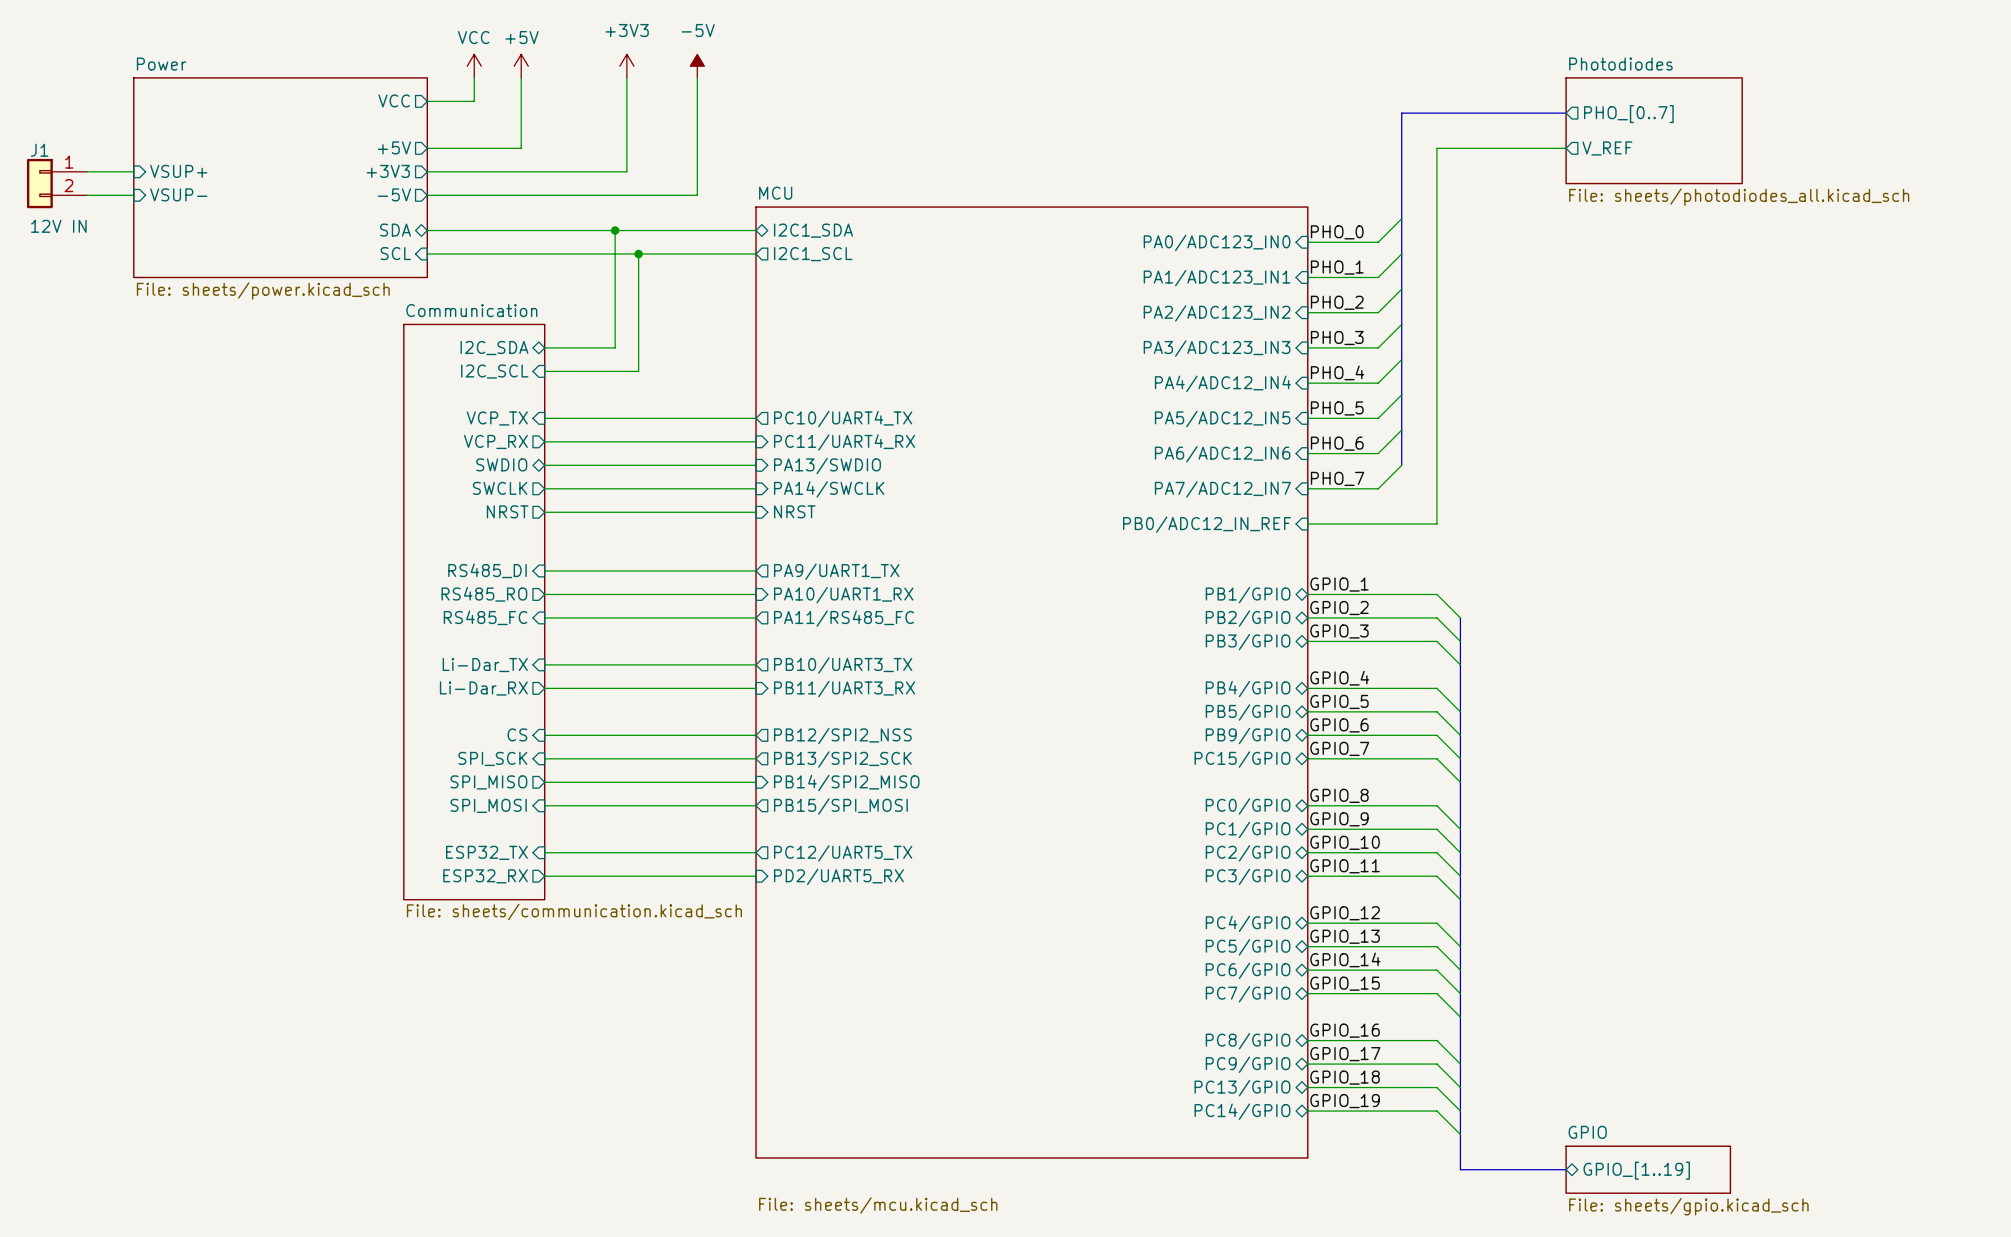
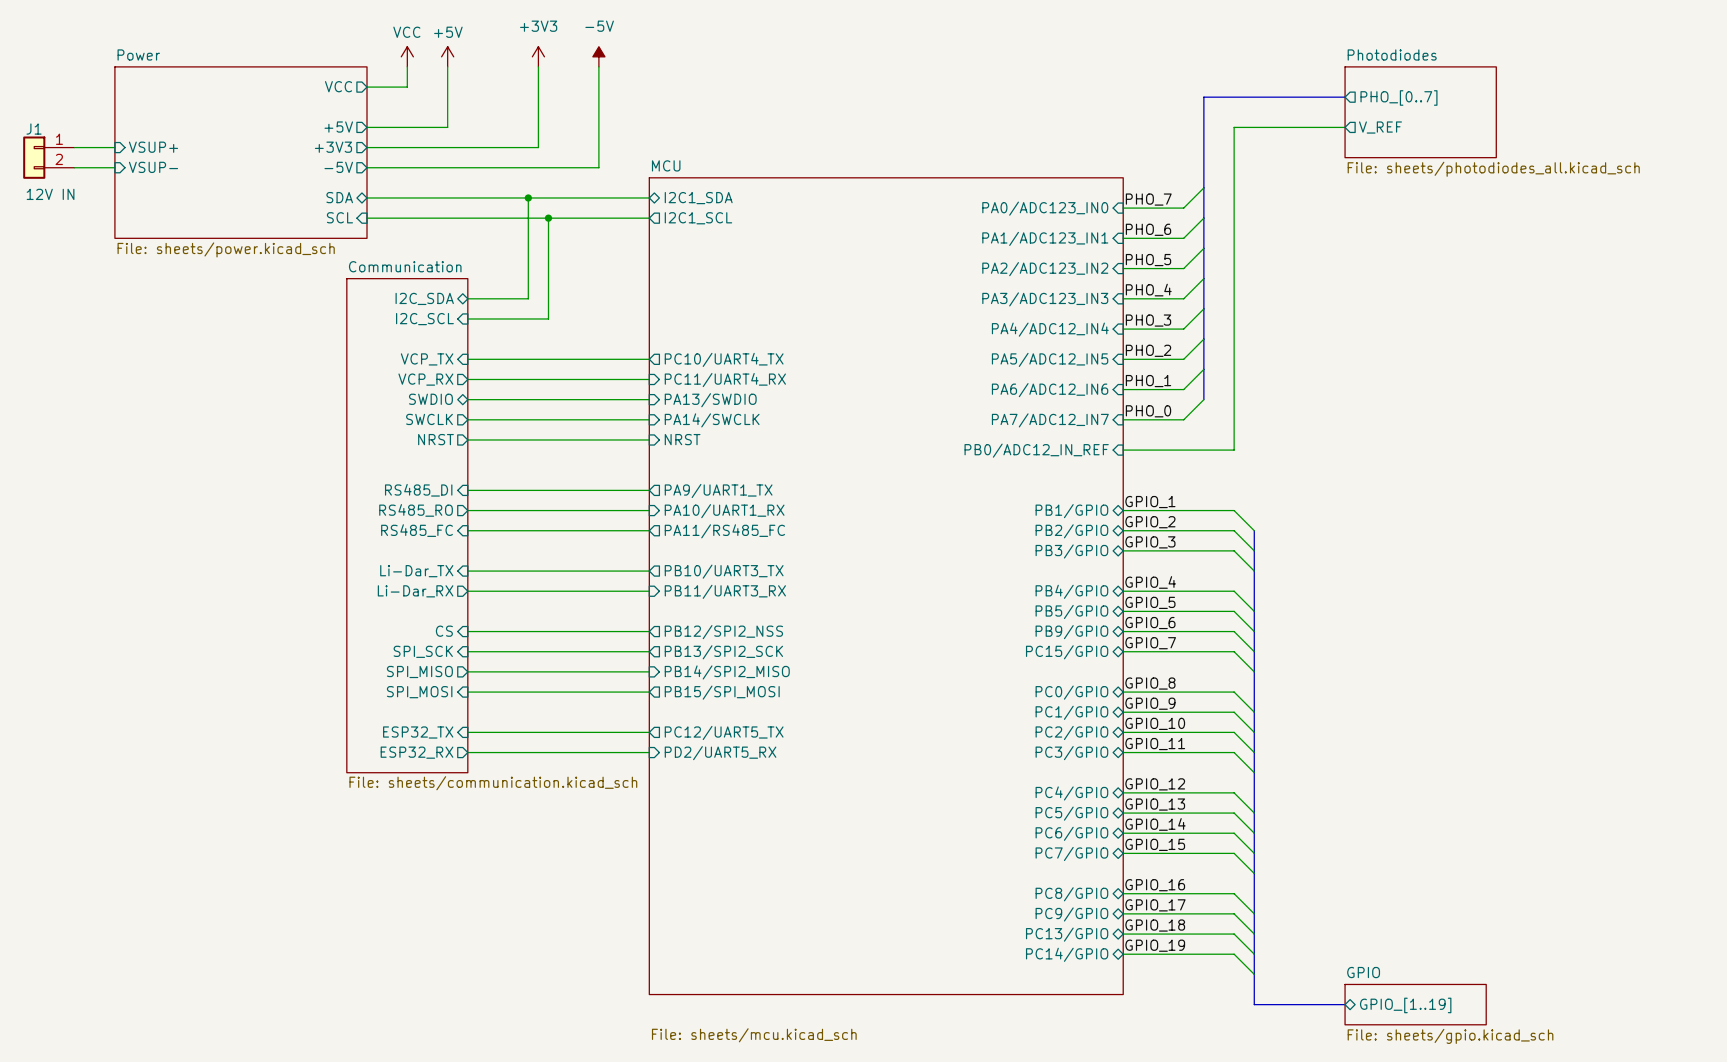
label: PHO_0 (1337, 232) -> PHO_7 (1148, 199)
label: PHO_1 (1337, 267) -> PHO_6 (1148, 229)
label: PHO_2 (1337, 302) -> PHO_5 (1148, 260)
label: PHO_3 (1337, 338) -> PHO_4 (1148, 290)
label: PHO_4 (1337, 372) -> PHO_3 (1148, 320)
label: PHO_5 (1337, 408) -> PHO_2 (1148, 350)
label: PHO_6 (1337, 443) -> PHO_1 (1148, 381)
label: PHO_7 (1337, 478) -> PHO_0 (1148, 411)

